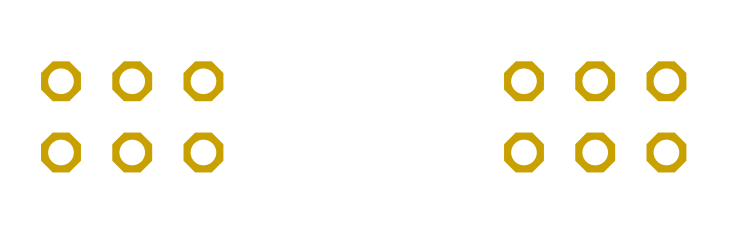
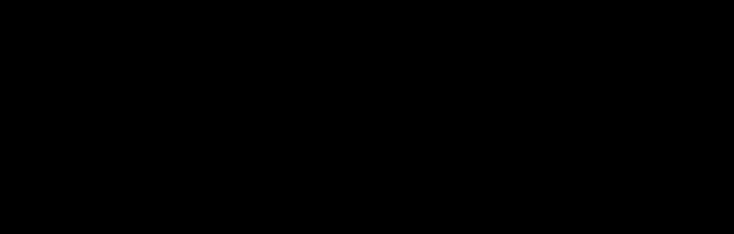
part: (132, 116) -> none
part: (595, 116) -> none

